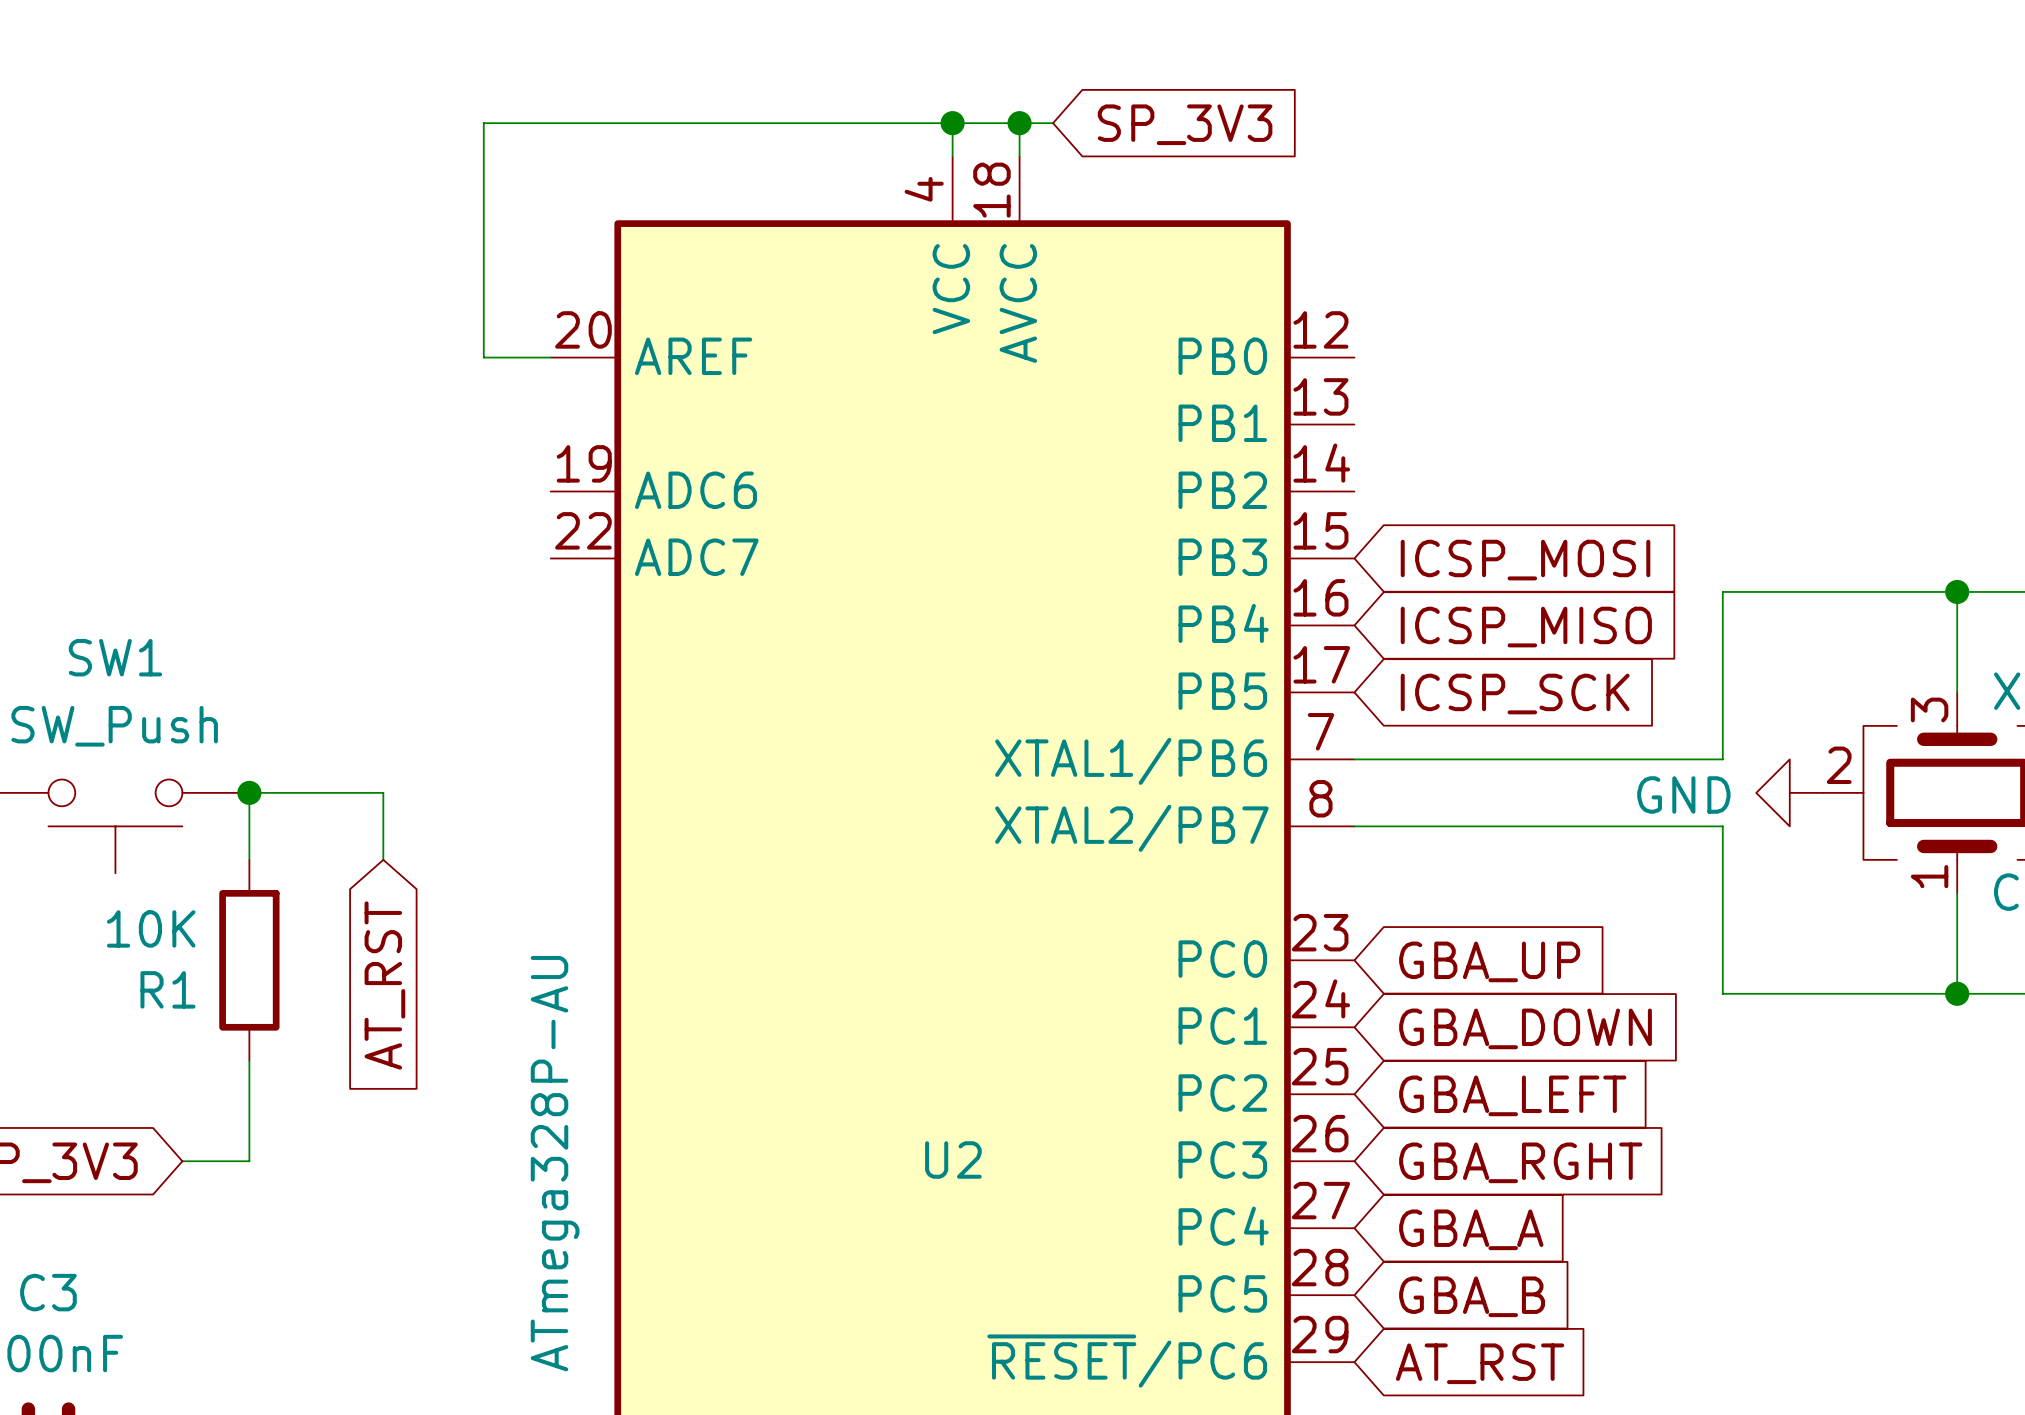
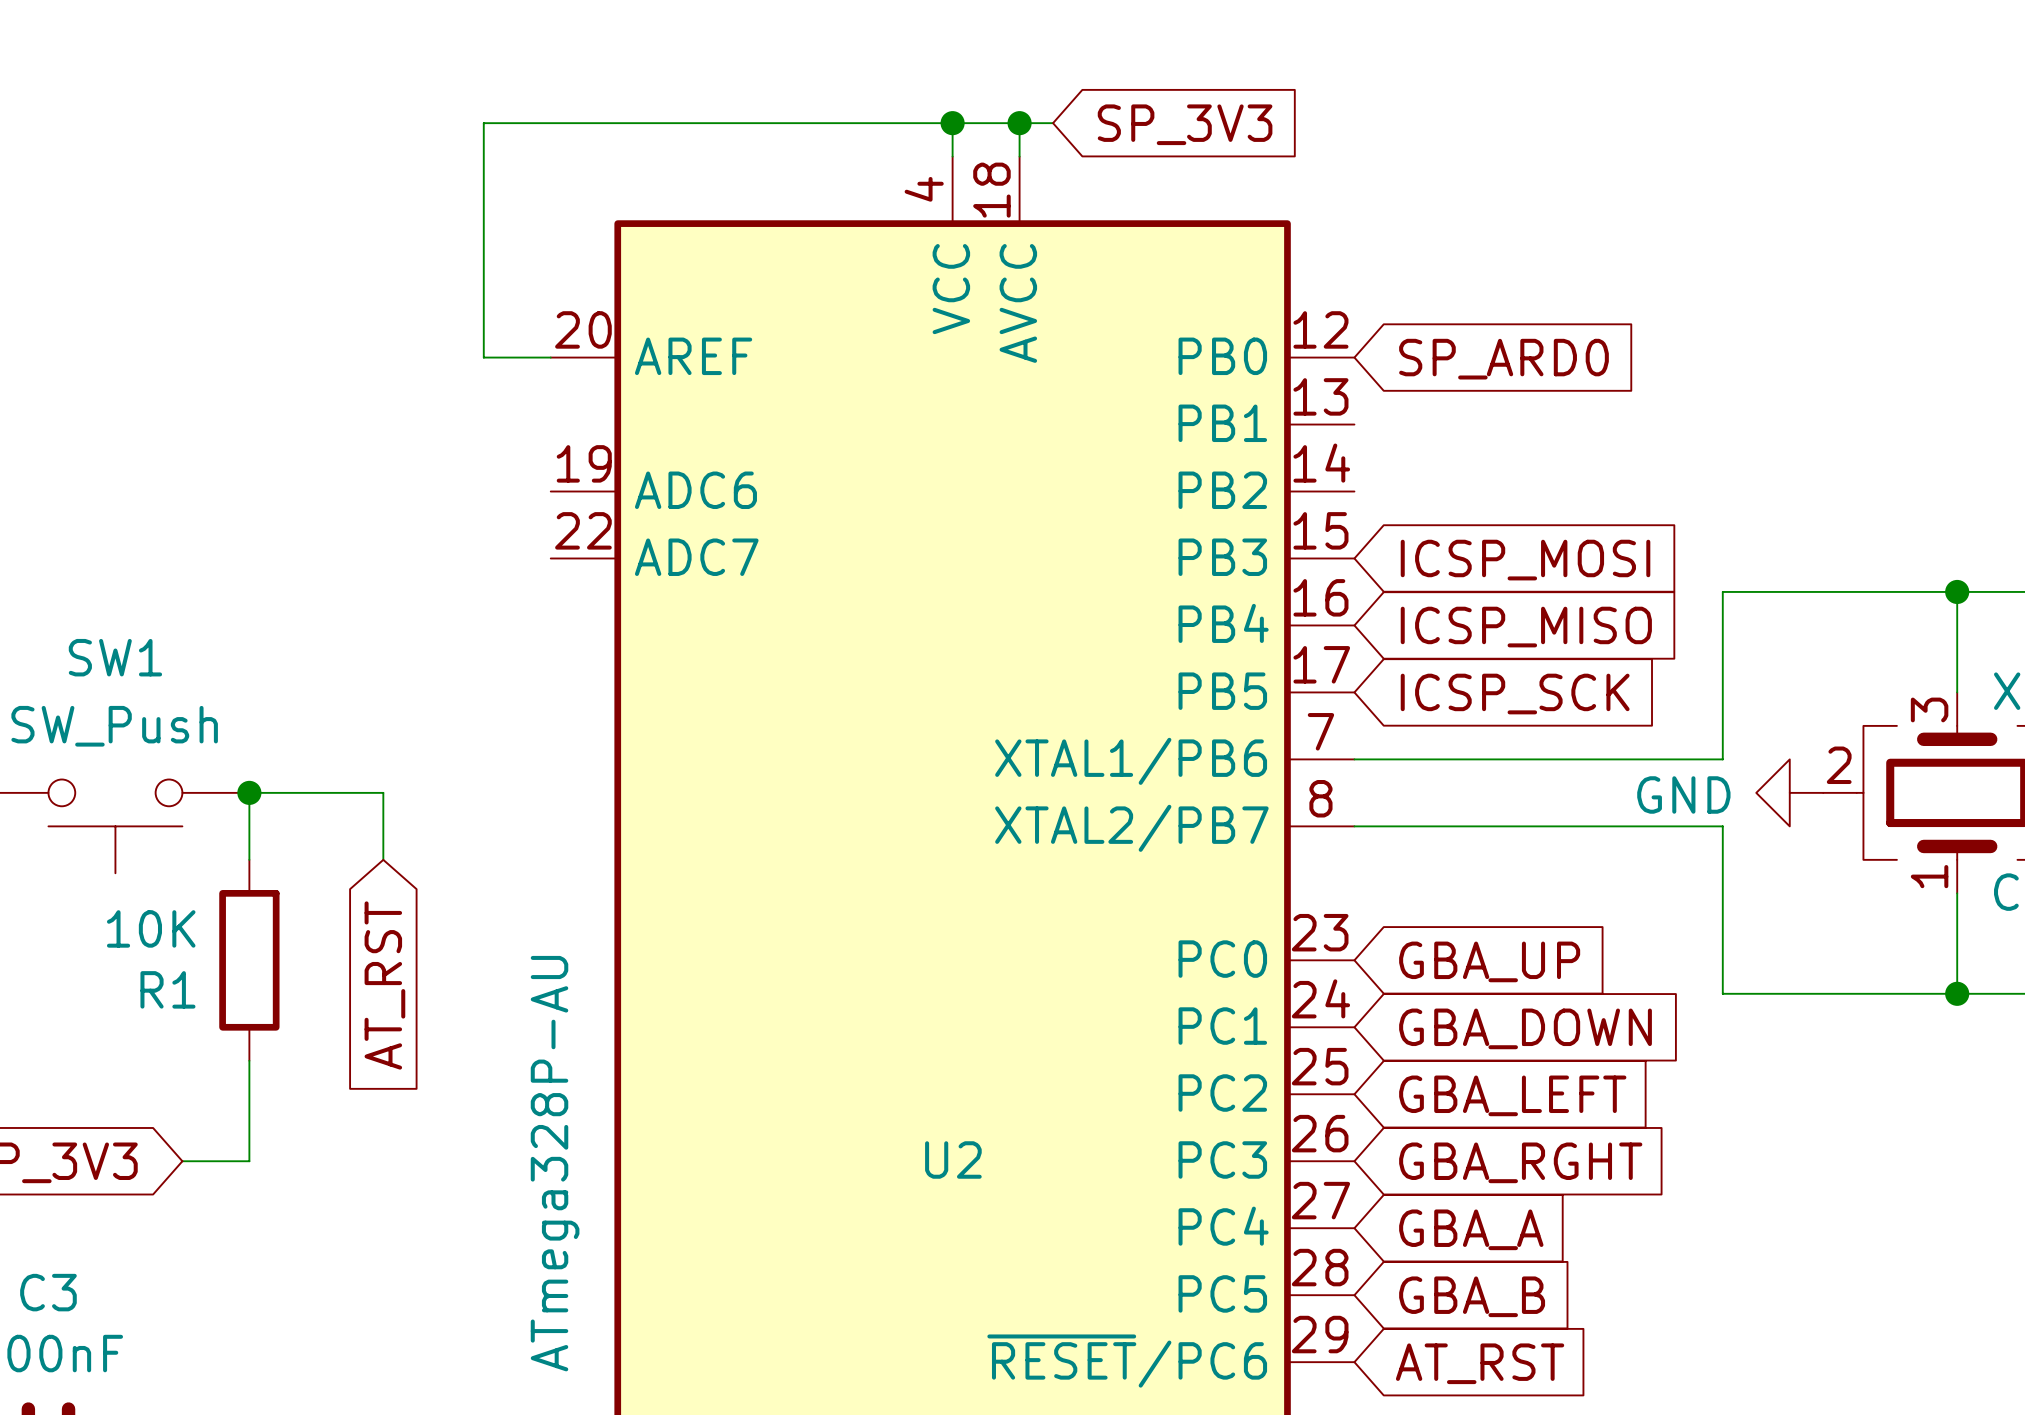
global label: none -> SP_ARD0 (1503, 359)

